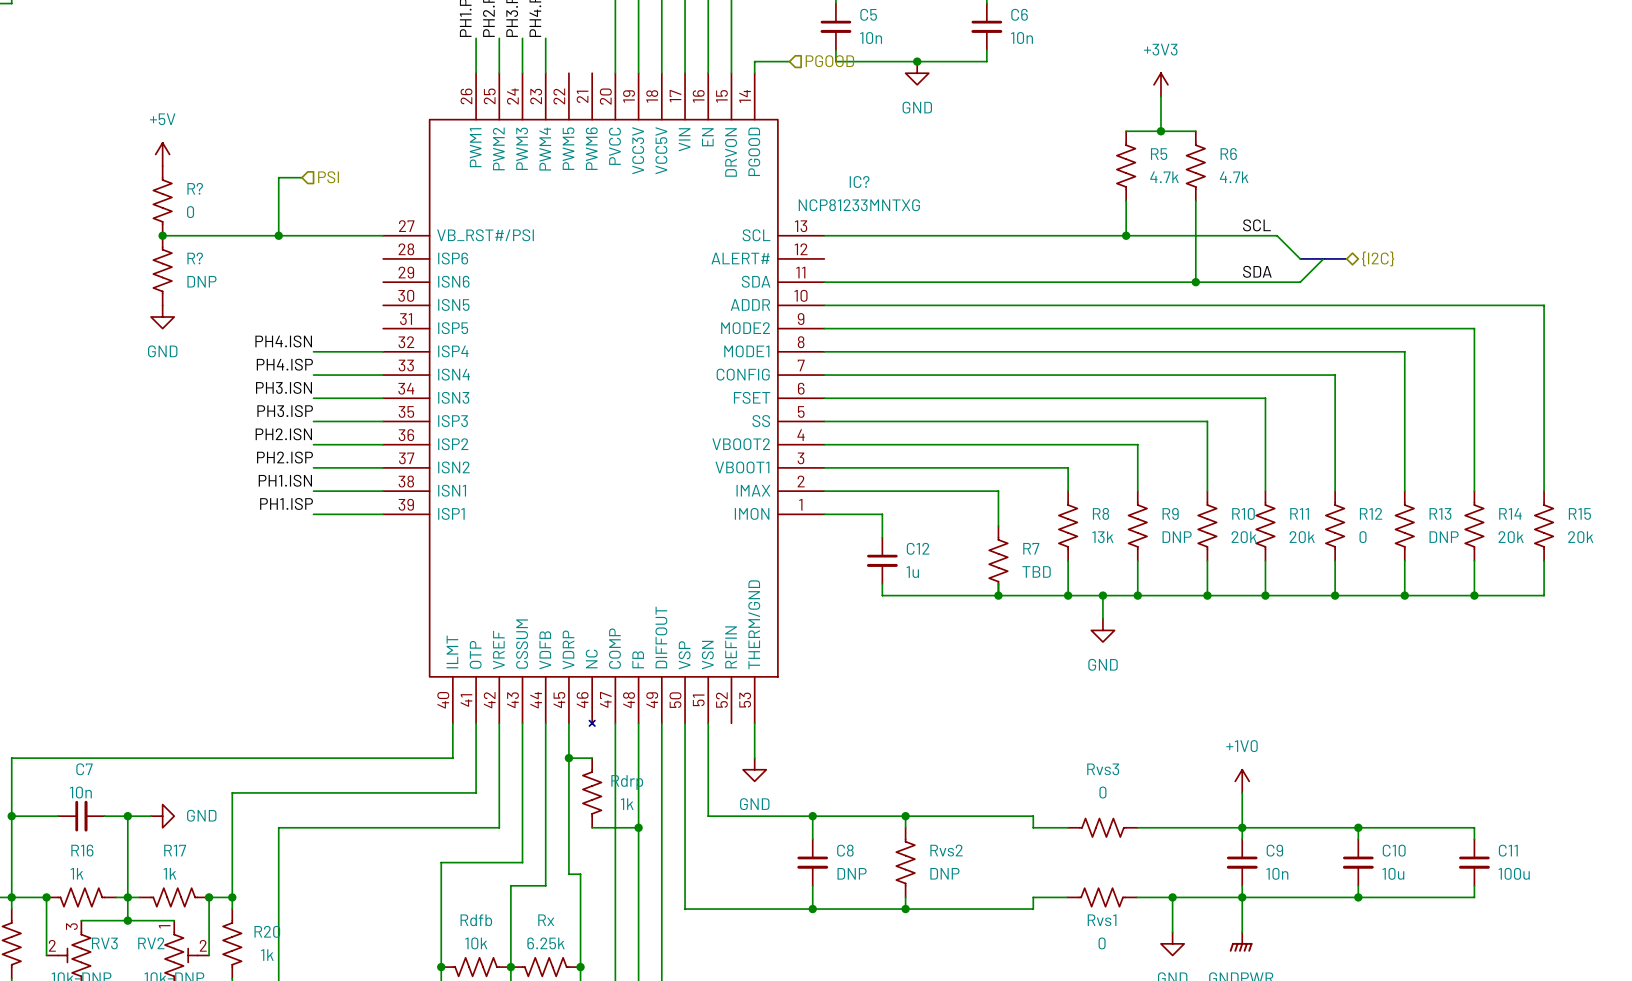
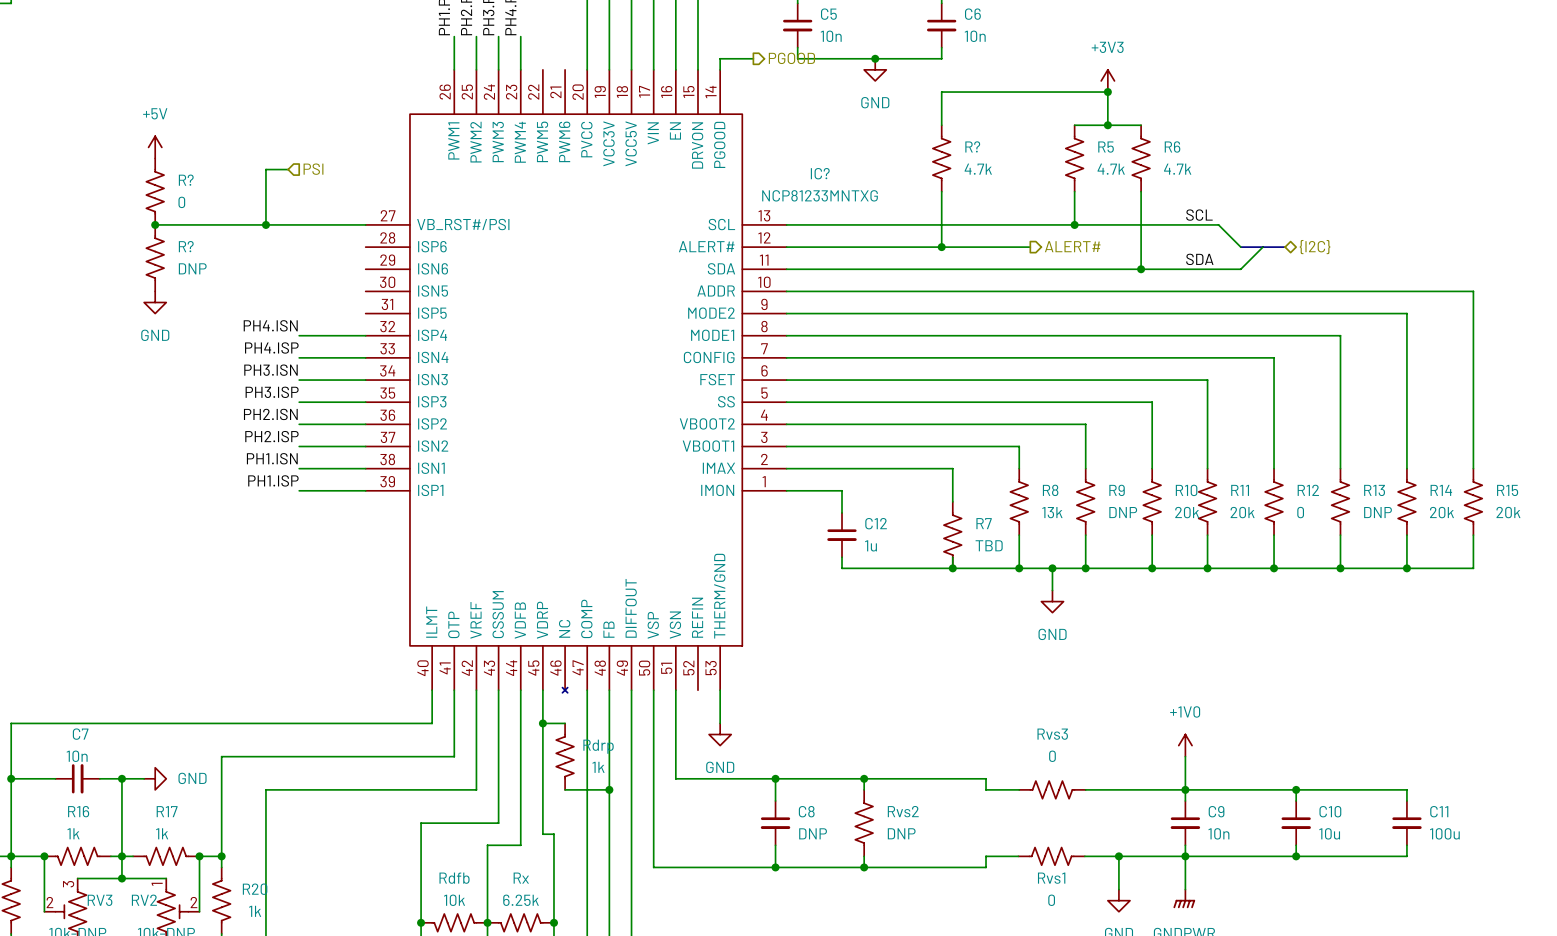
hierarchical label shape: input (829, 61) -> output (791, 58)
wire: none -> (1107, 92) (941, 92) (941, 125)
junction: none -> (1107, 92)
R?: none -> 4.7k (941, 158)
wire: none -> (941, 191) (941, 247)
wire: none -> (786, 247) (1030, 247)
junction: none -> (941, 247)
hierarchical label: none -> ALERT# (1072, 246)

